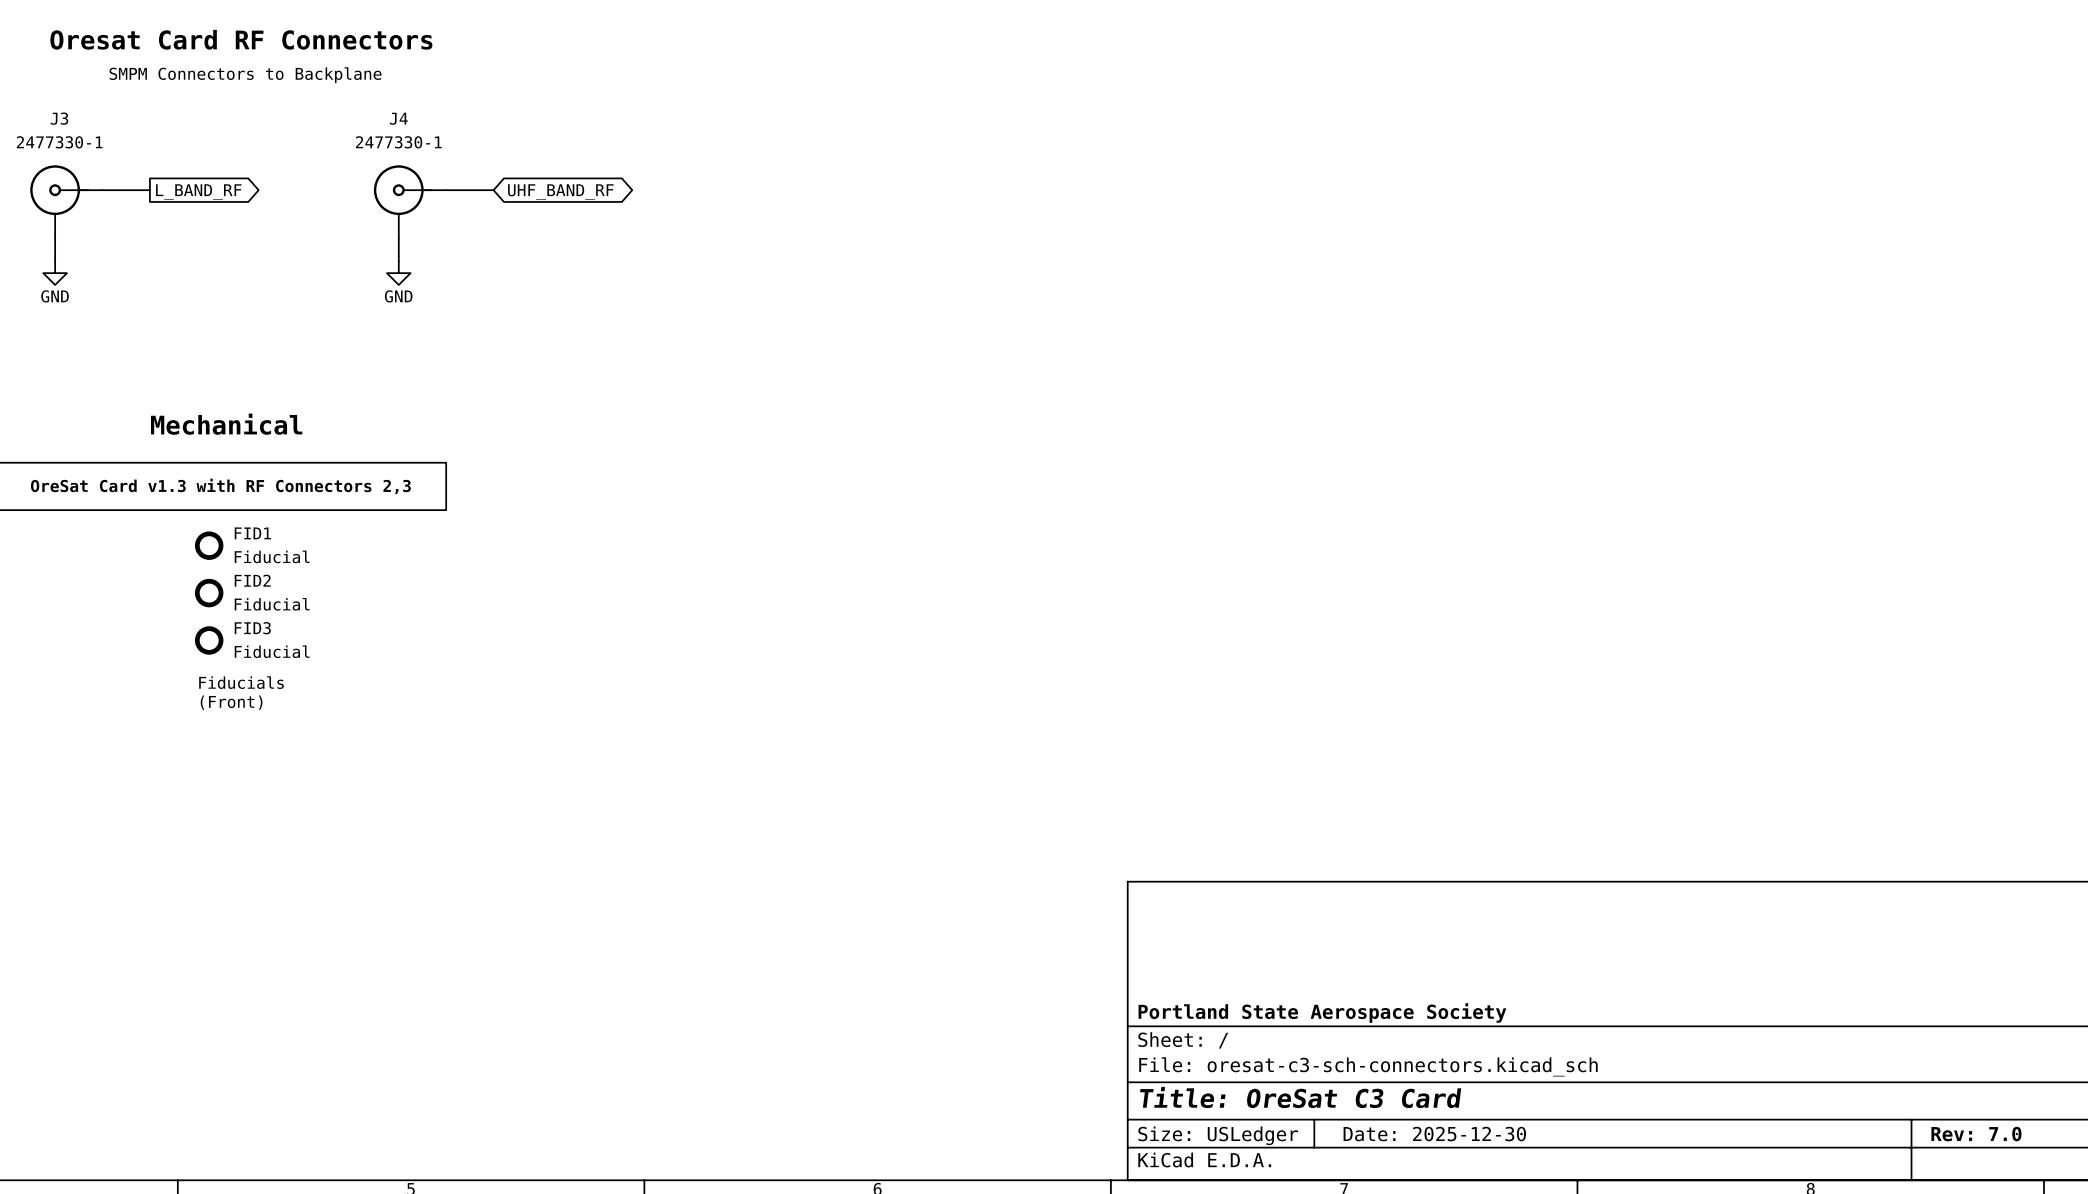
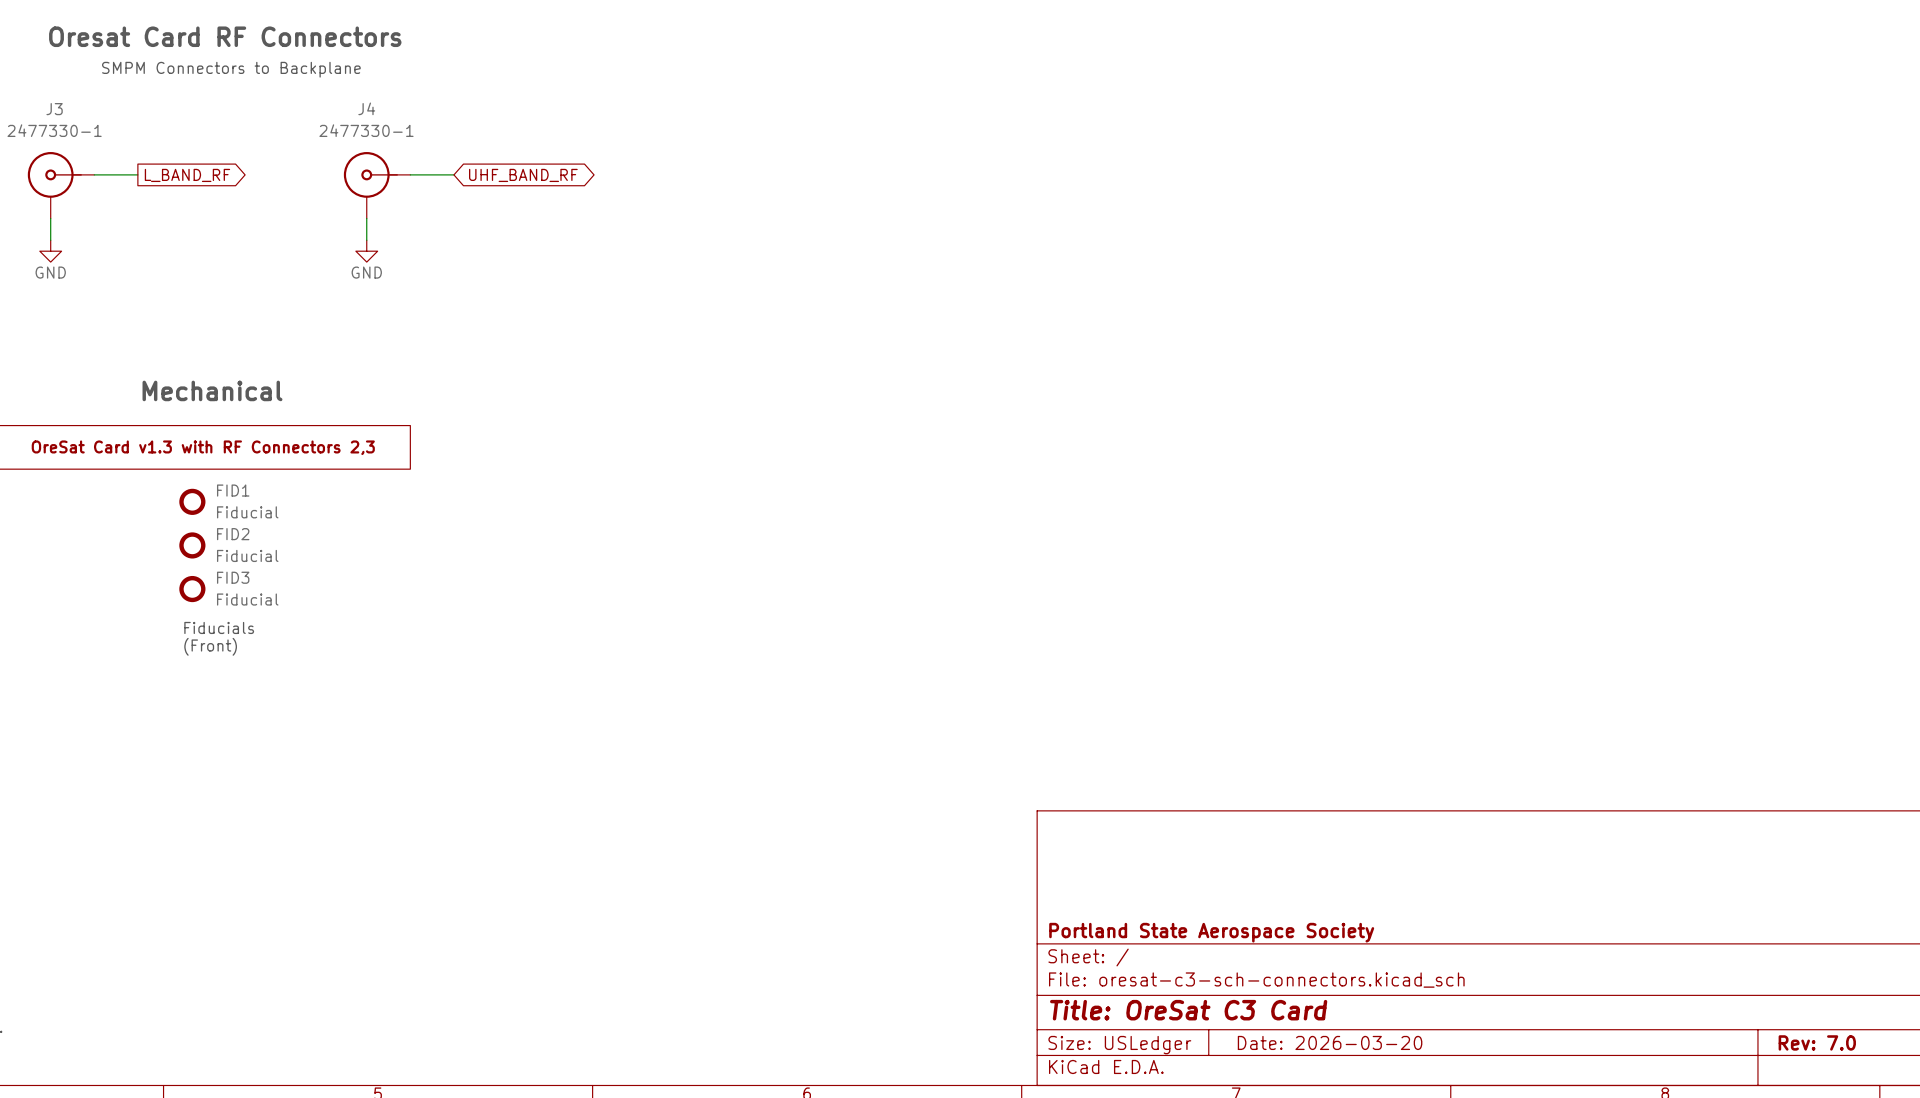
title block: Date: 2025-12-30 (1434, 1134) -> Date: 2026-03-20 (1330, 1042)

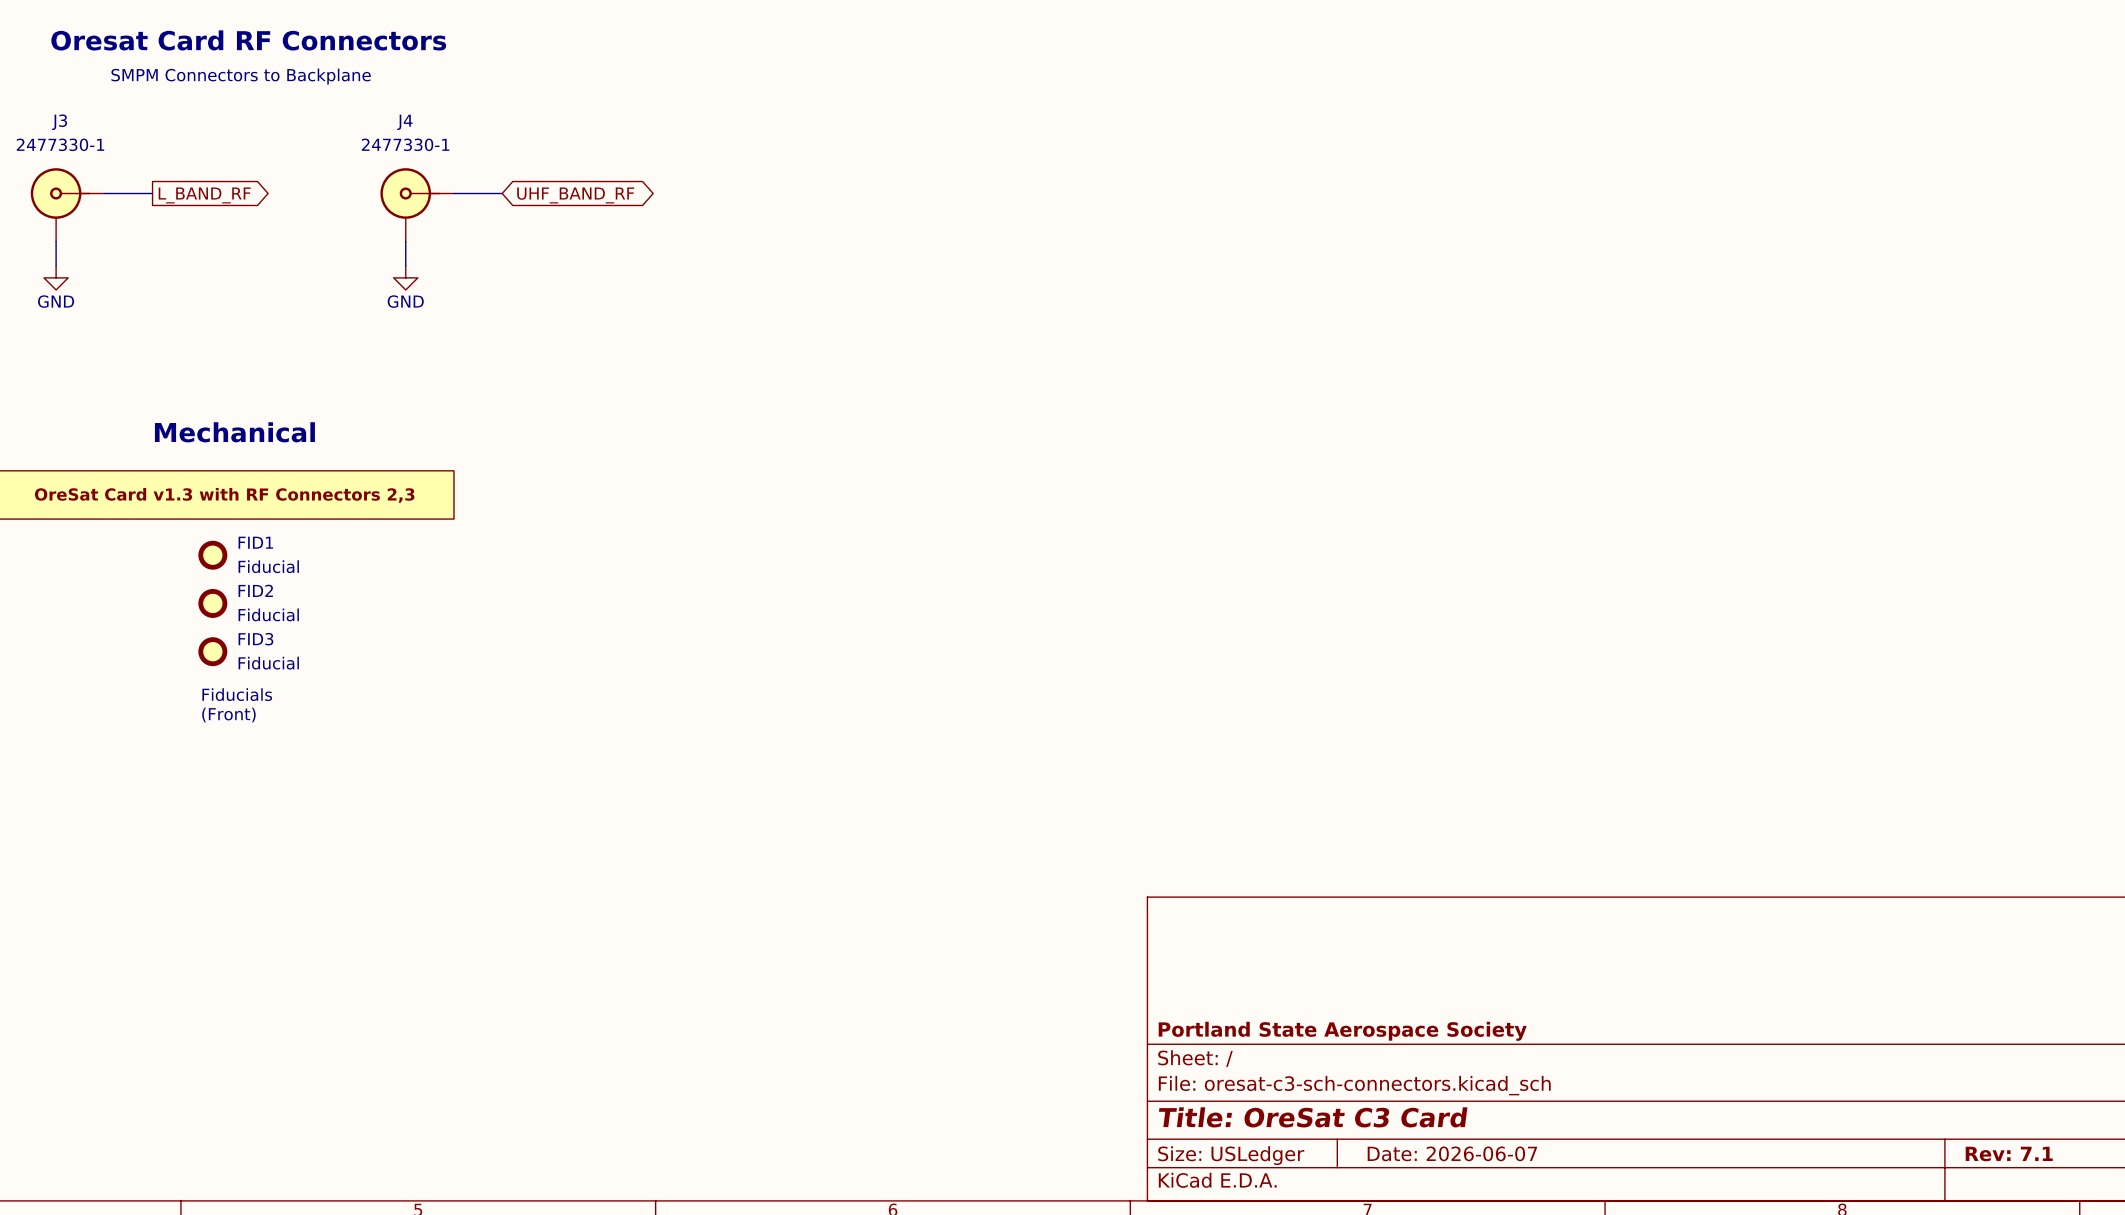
title block: Date: 2026-03-20 (1330, 1042) -> Date: 2026-06-07 (1452, 1153)
title block: Rev: 7.0 (1817, 1042) -> Rev: 7.1 (2009, 1154)

